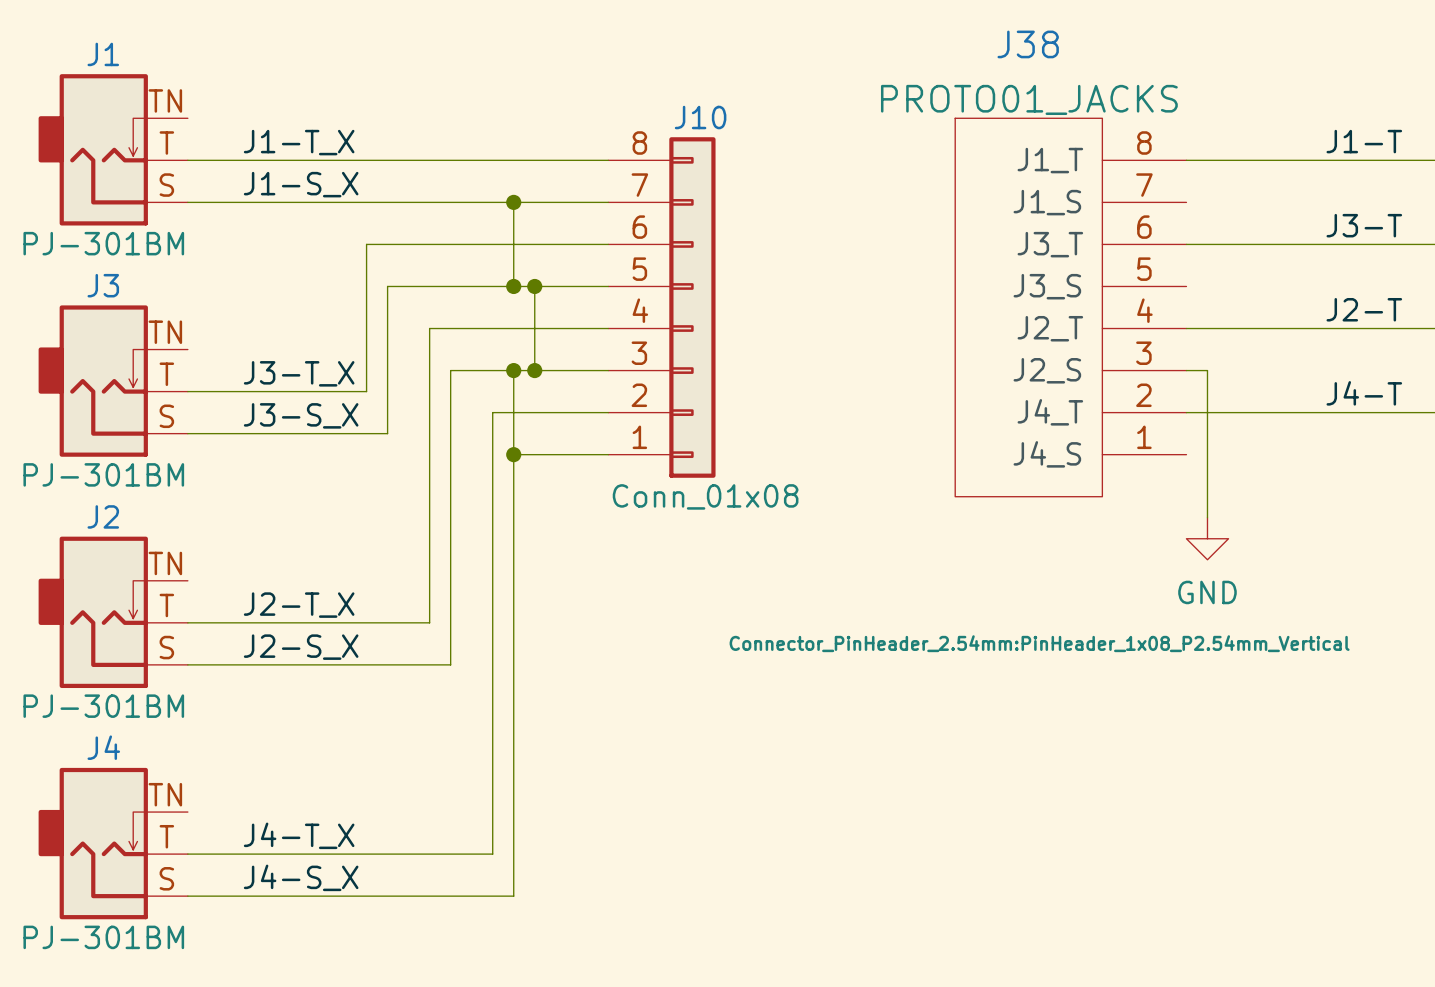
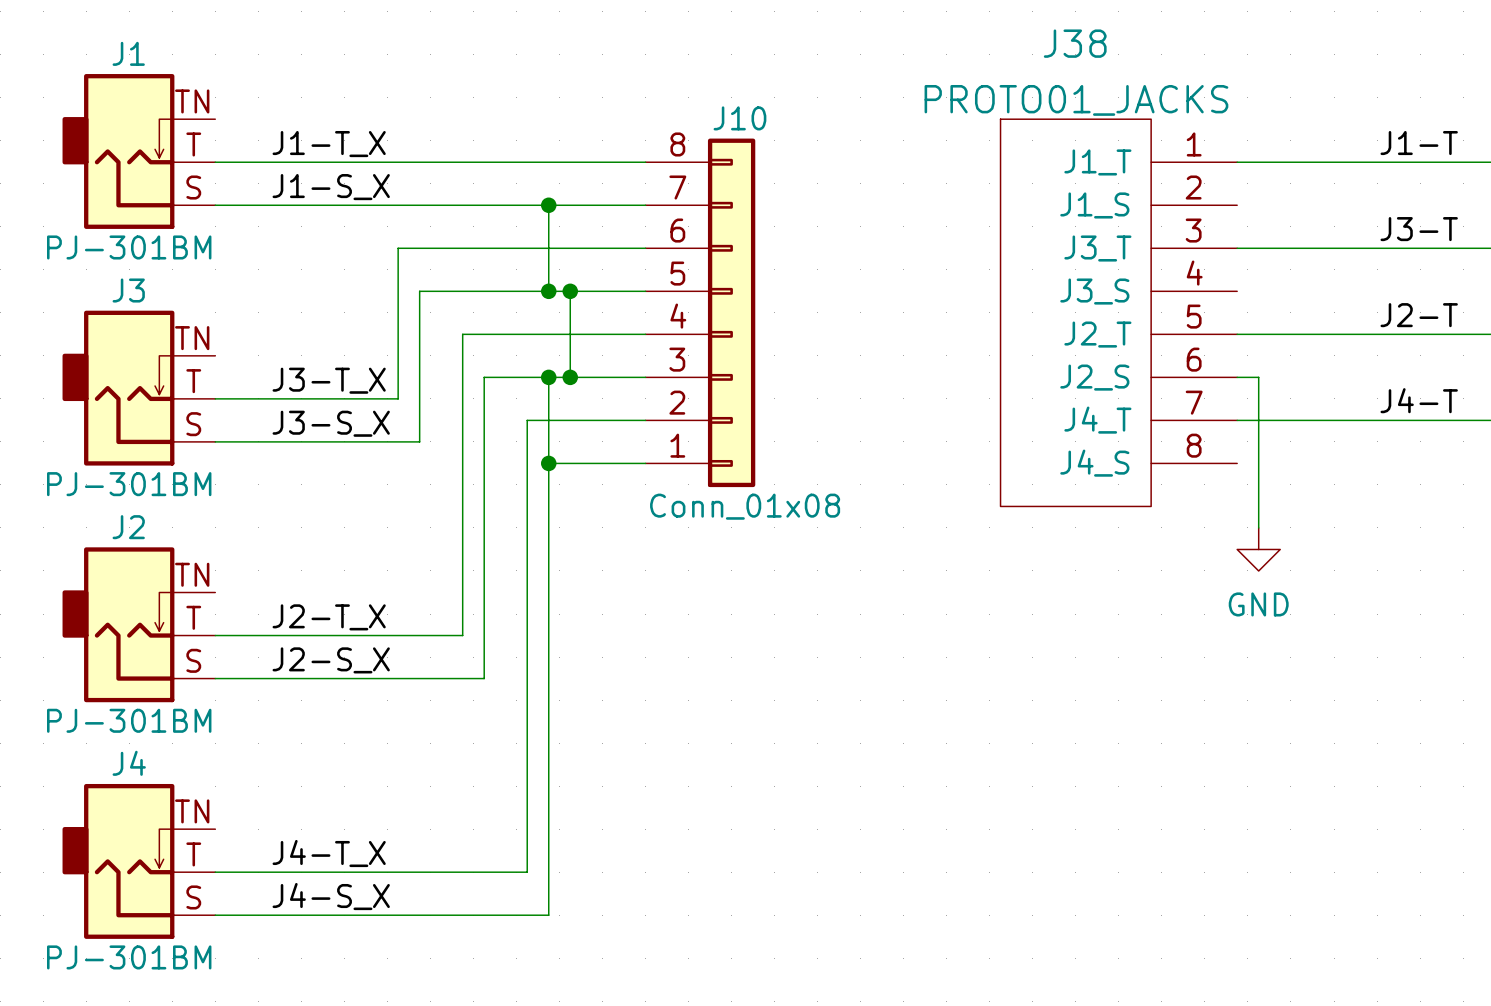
J38 pin number: 8 (1144, 143) -> 1 (1194, 144)
J38 pin number: 7 (1144, 185) -> 2 (1193, 187)
J38 pin number: 6 (1144, 227) -> 3 (1193, 230)
J38 pin number: 5 (1144, 269) -> 4 (1194, 273)
J38 pin number: 4 (1144, 310) -> 5 (1194, 316)
J38 pin number: 3 (1143, 353) -> 6 (1194, 359)
J38 pin number: 2 (1143, 395) -> 7 (1194, 402)
J38 pin number: 1 (1144, 437) -> 8 (1194, 445)
J38 text: Connector_PinHeader_2.54mm:PinHeader_1x08_P2.54mm_Vertical (1039, 643) -> none

